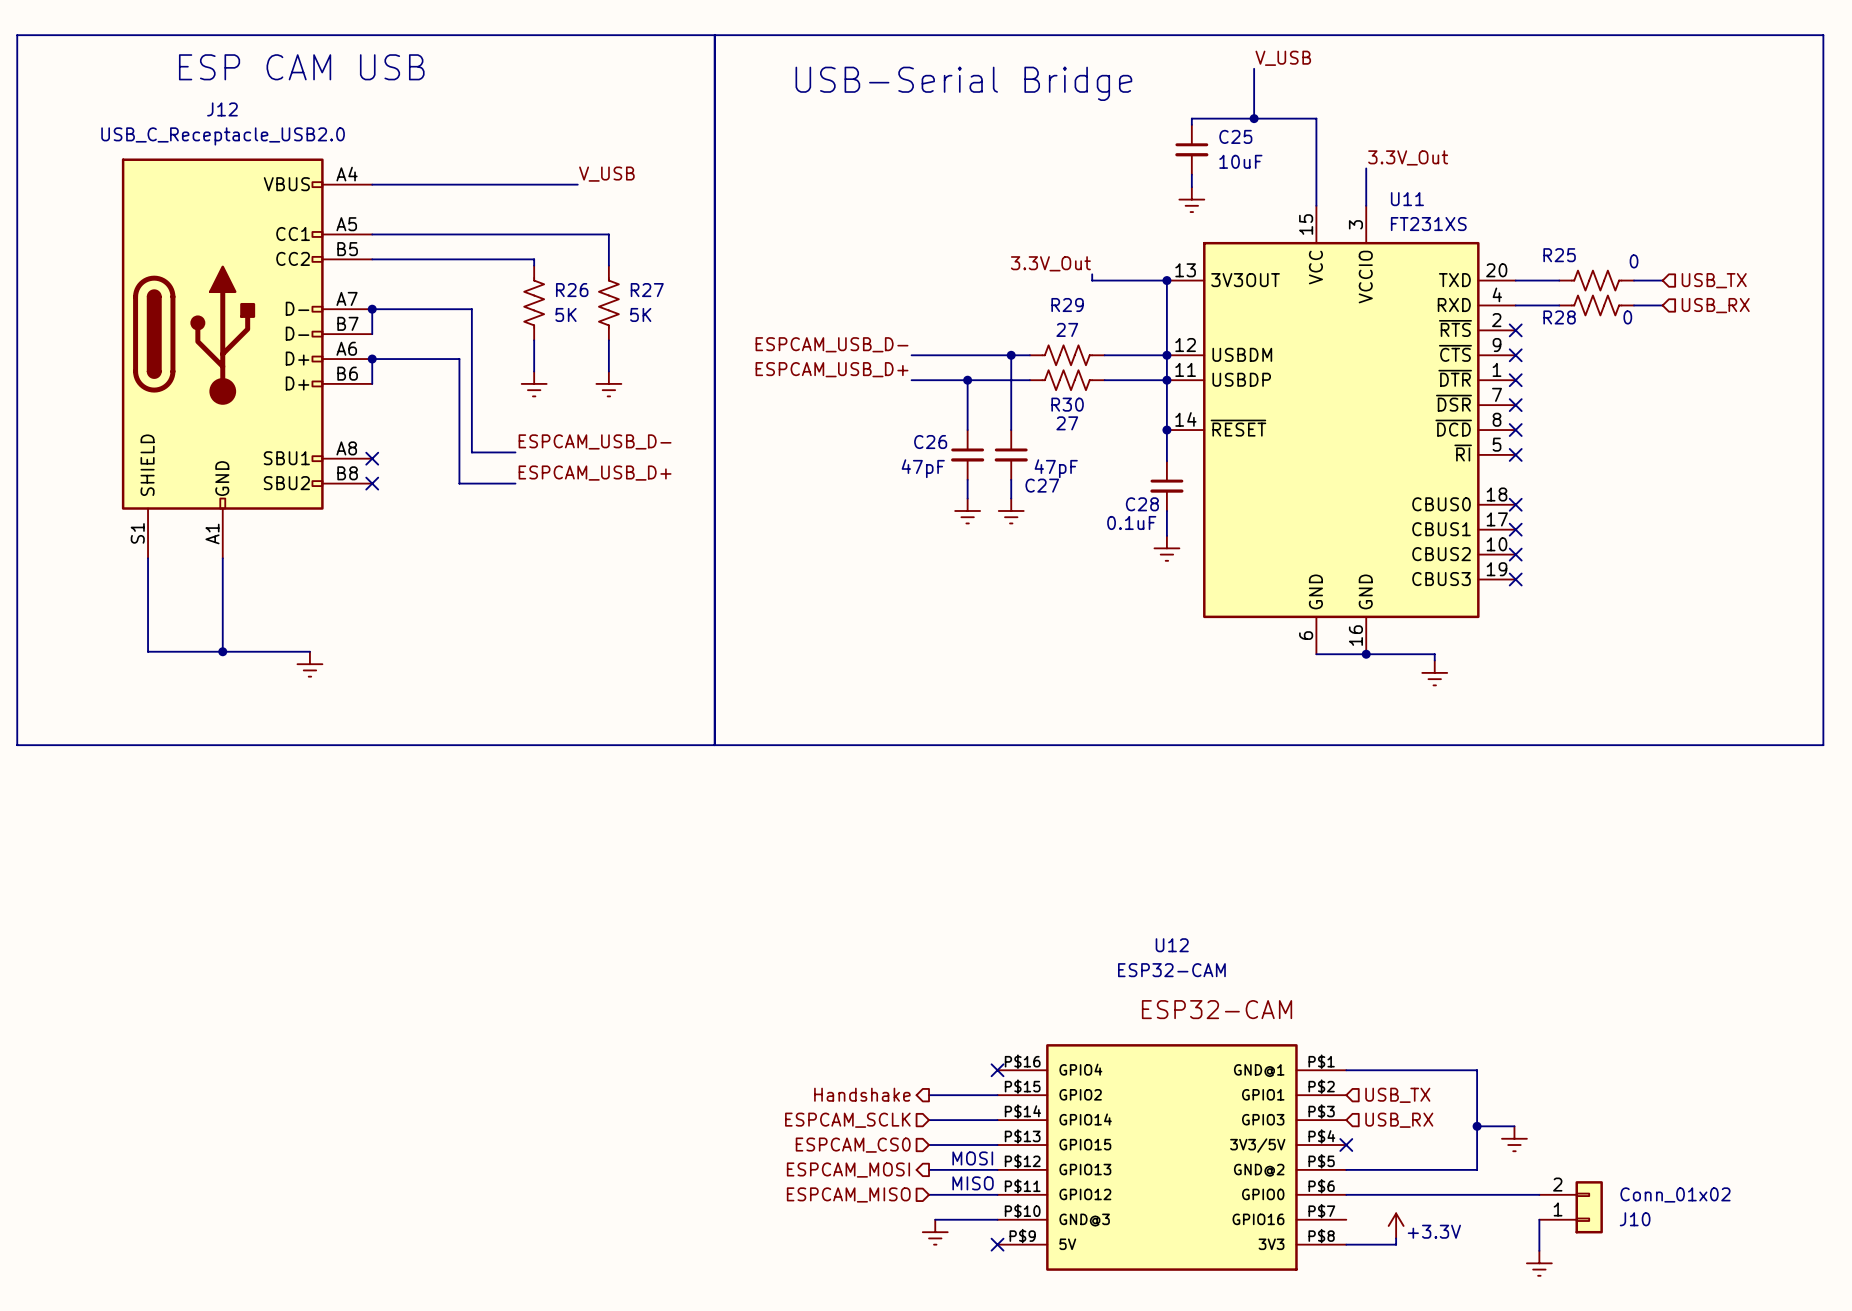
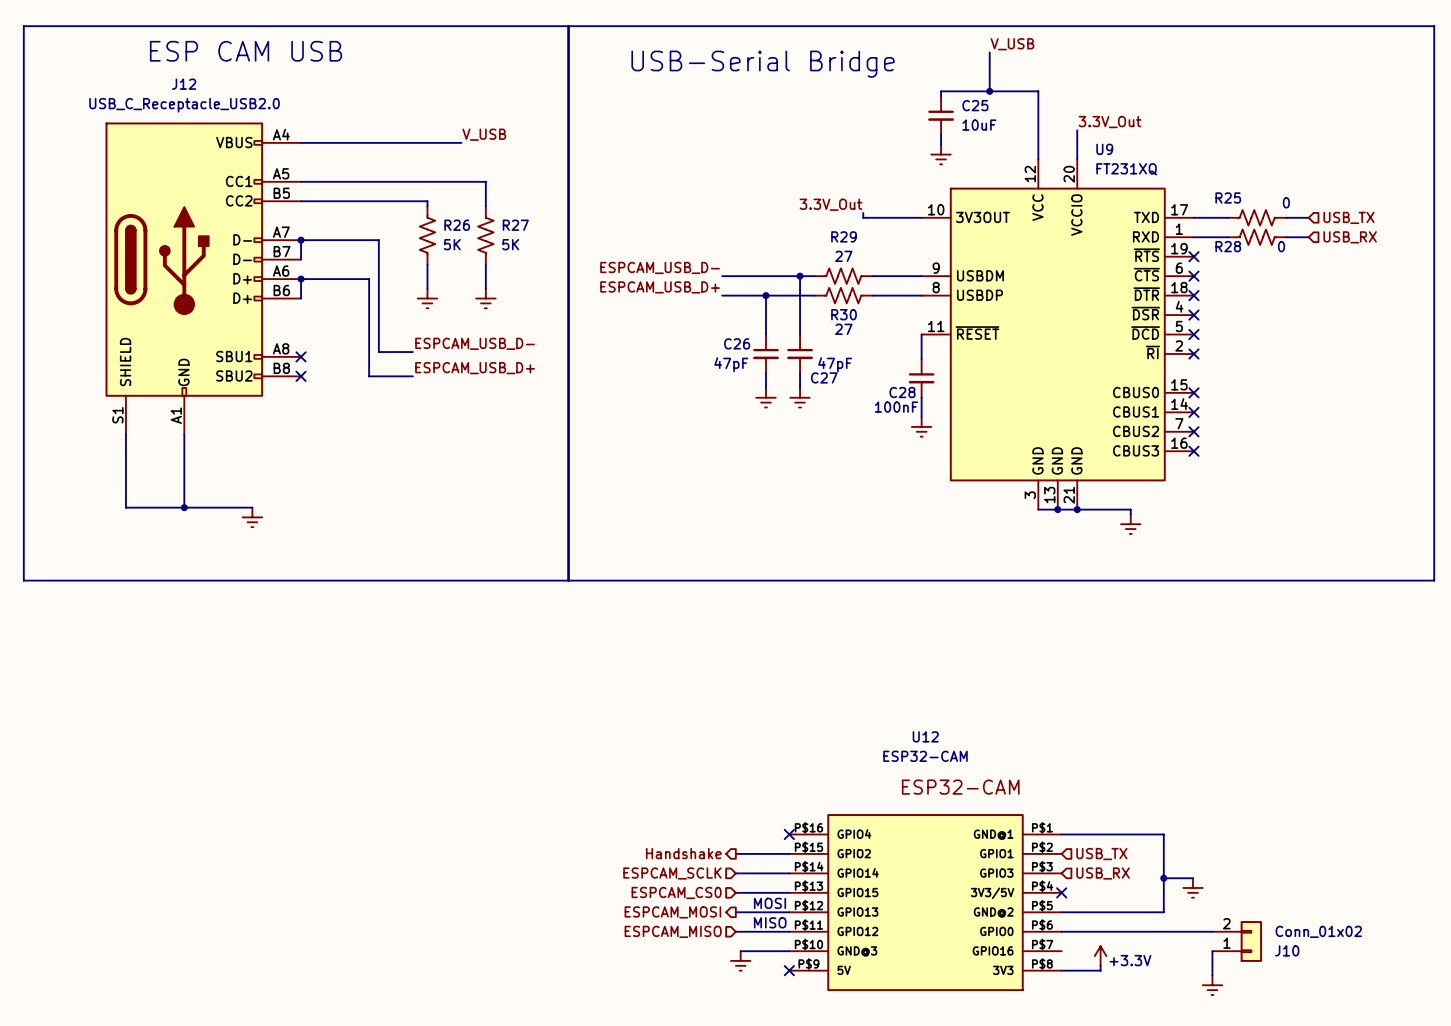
wire: (1166, 280) (1166, 430) -> none
junction: (1166, 280) -> none
junction: (1166, 355) -> none
junction: (1166, 380) -> none
junction: (1166, 430) -> none
U11: FT231XS (1341, 430) -> none
U9: none -> FT231XQ (1057, 334)
C28 value: 0.1uF (1131, 522) -> 100nF (896, 407)
junction: none -> (1057, 509)

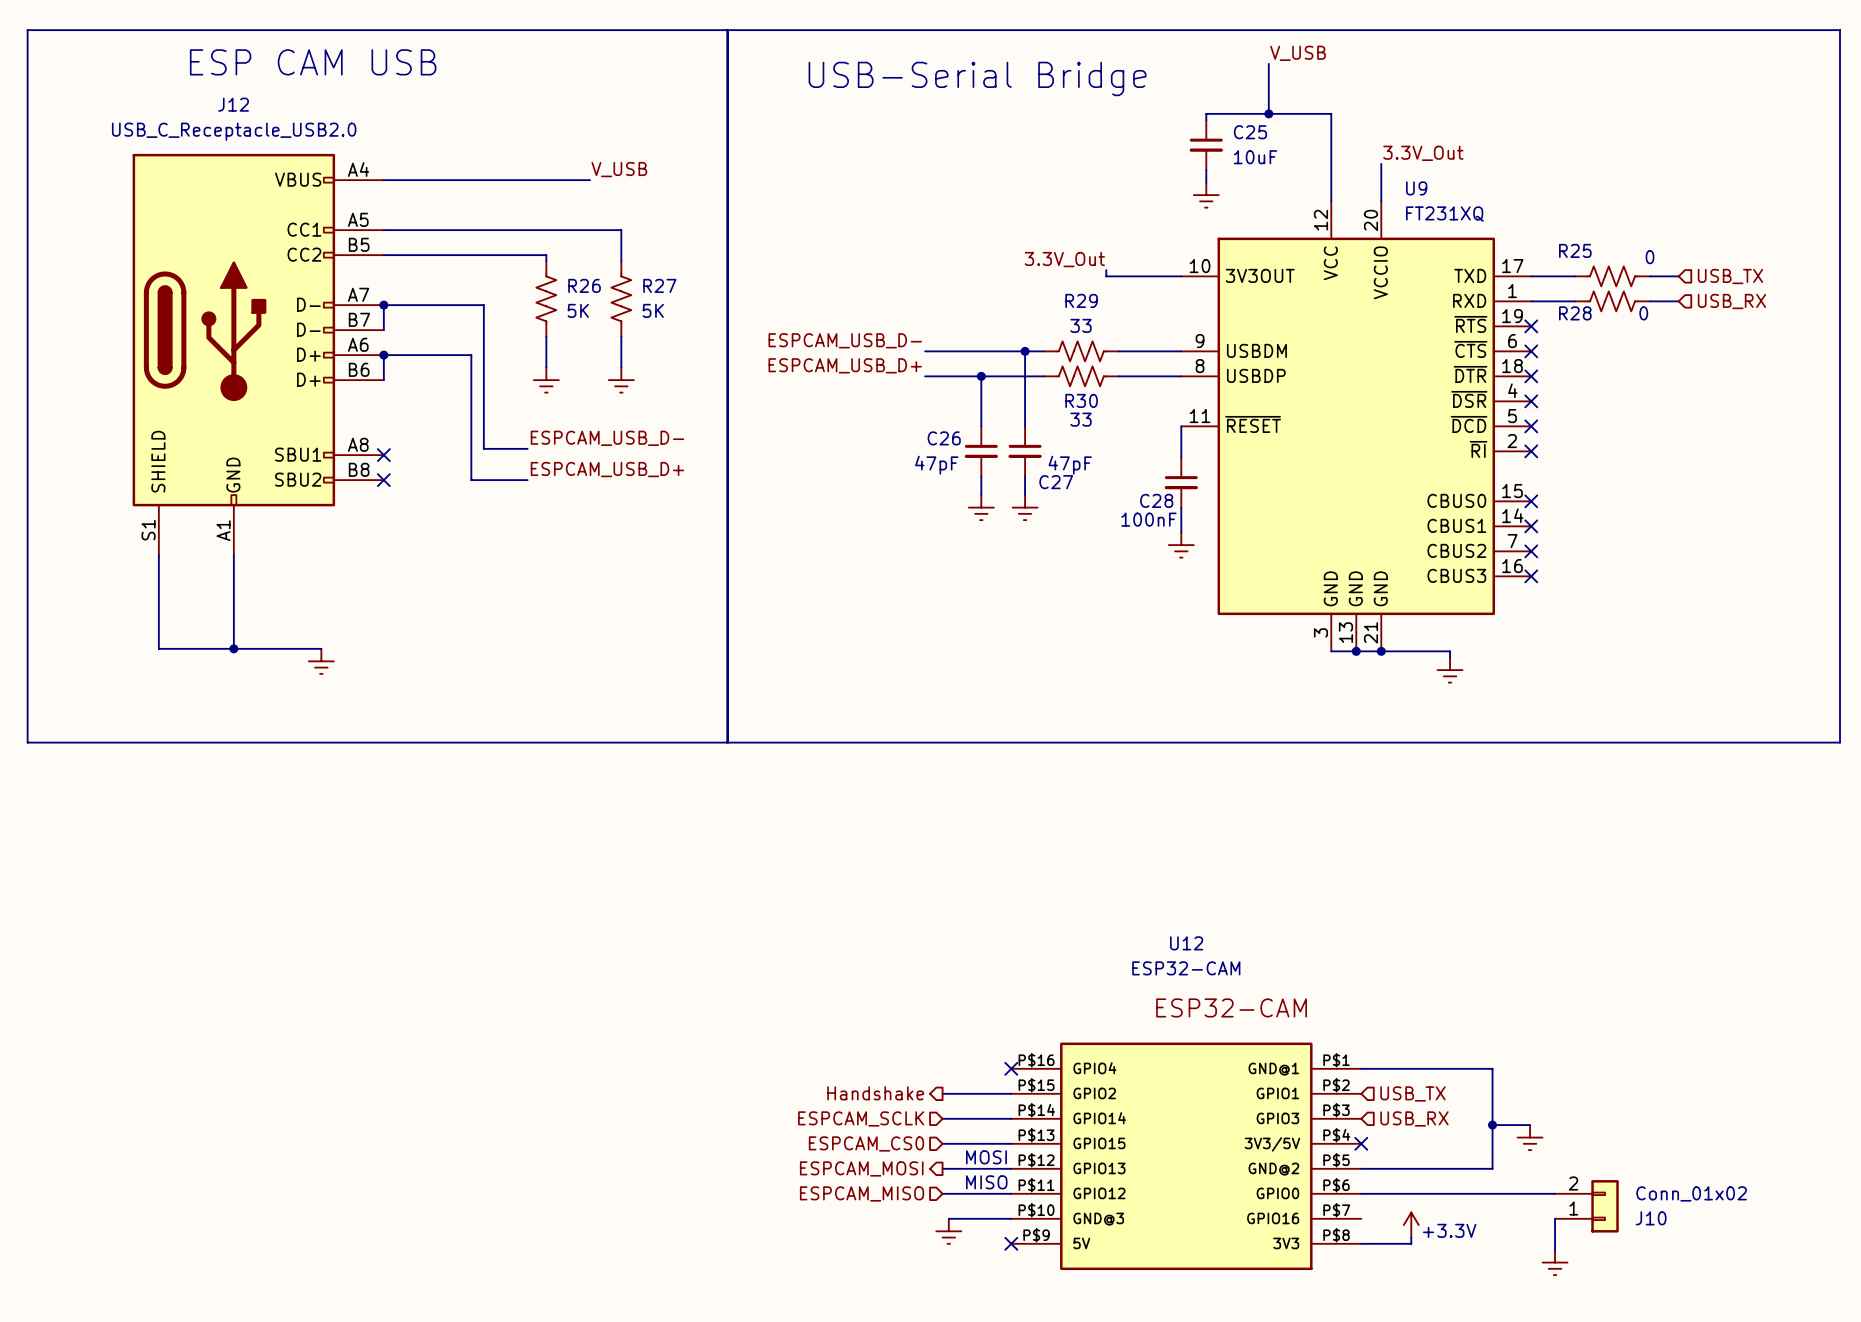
R29 value: 27 (843, 256) -> 33 (1081, 325)
R30 value: 27 (843, 329) -> 33 (1081, 419)

